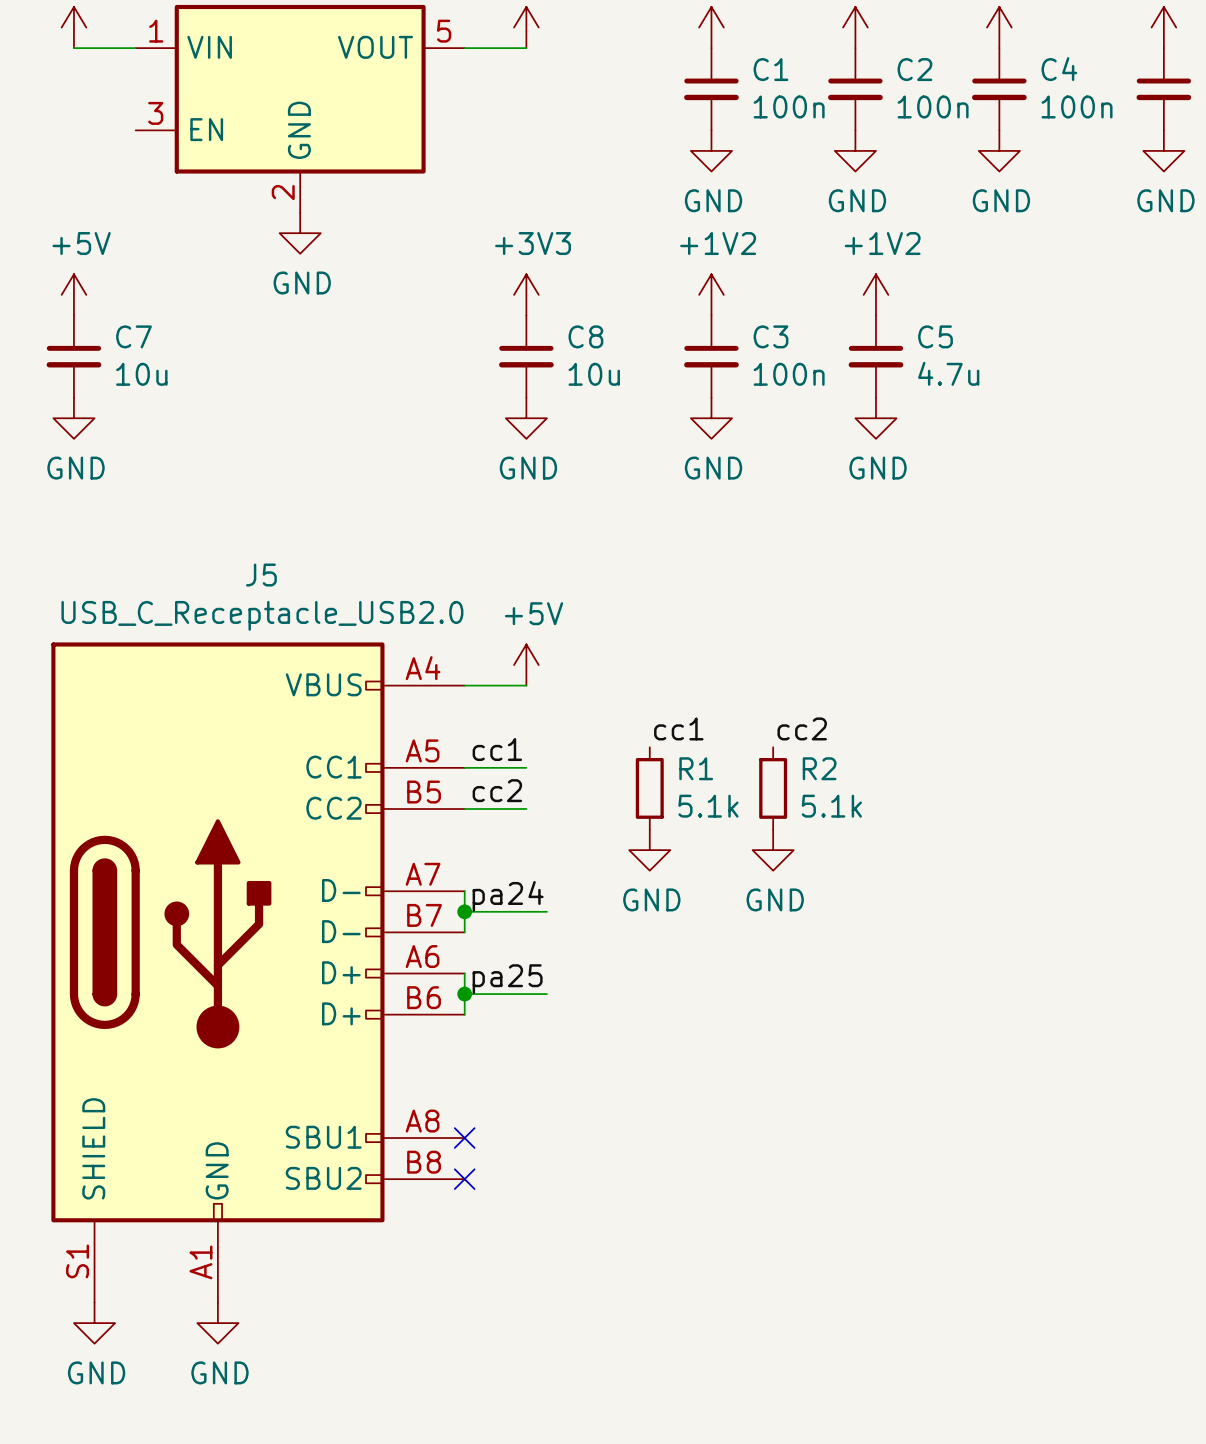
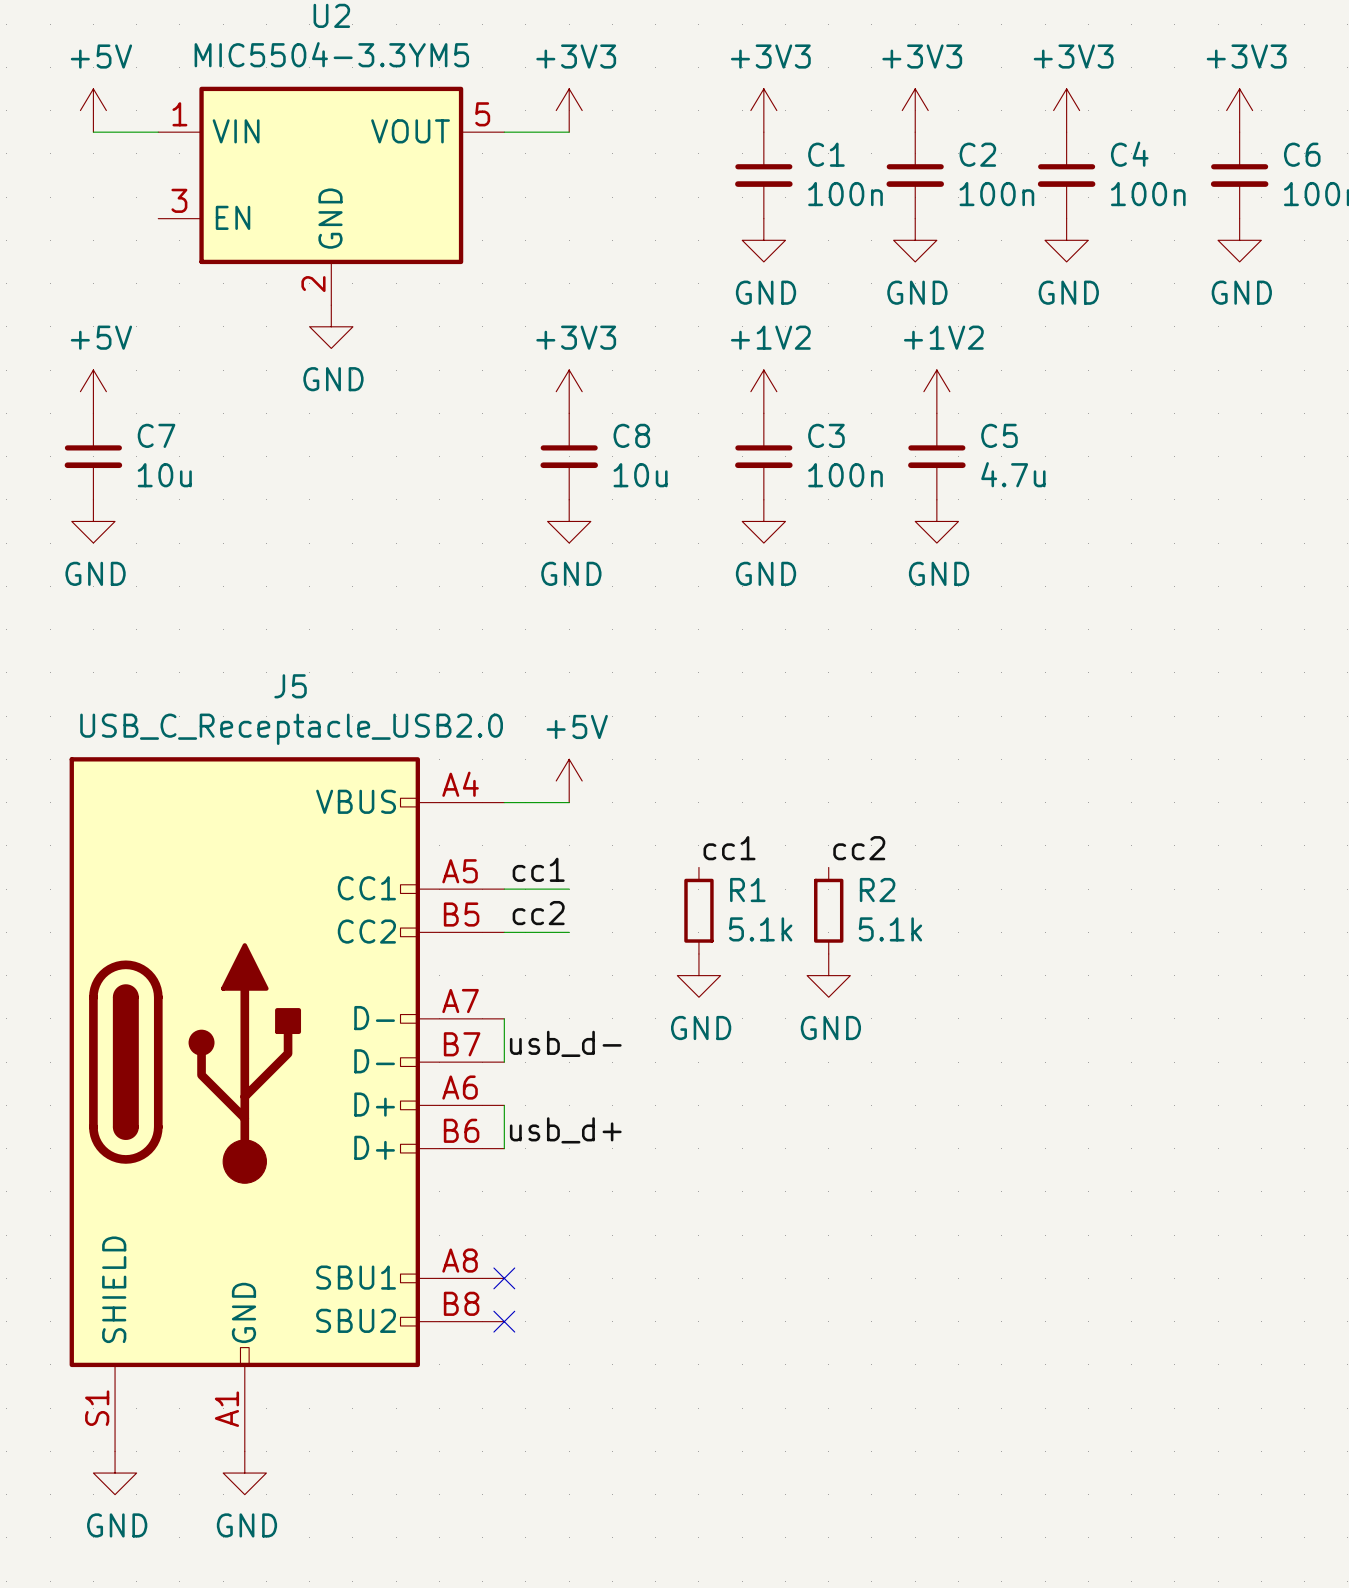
label: pa24 (508, 896) -> none
wire: (464, 911) (546, 911) -> none
junction: (464, 911) -> none
label: none -> usb_d- (565, 1043)
label: pa25 (507, 979) -> none
wire: (464, 994) (546, 994) -> none
junction: (464, 994) -> none
label: none -> usb_d+ (565, 1130)

